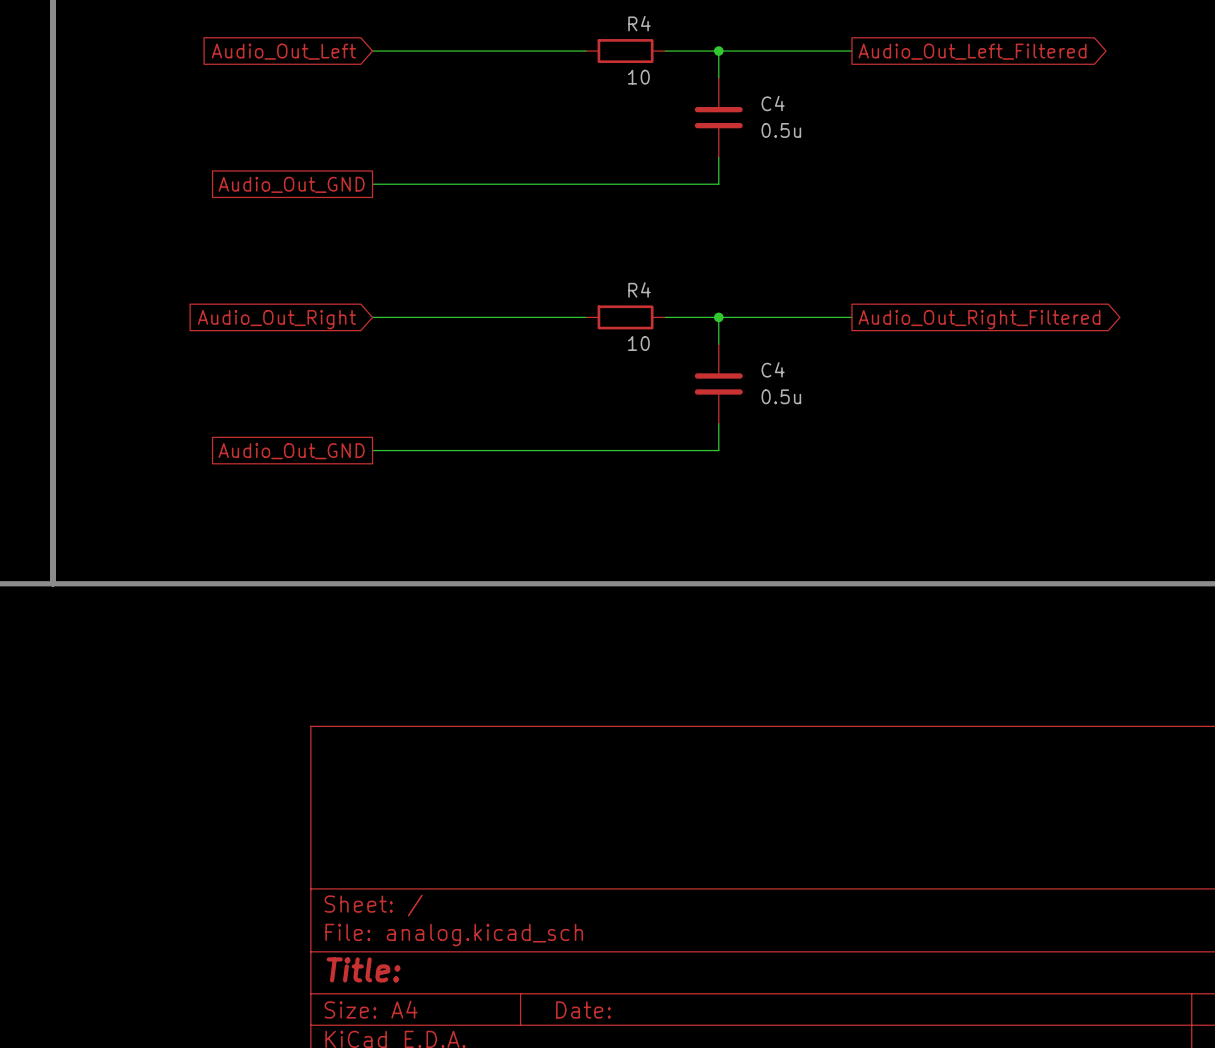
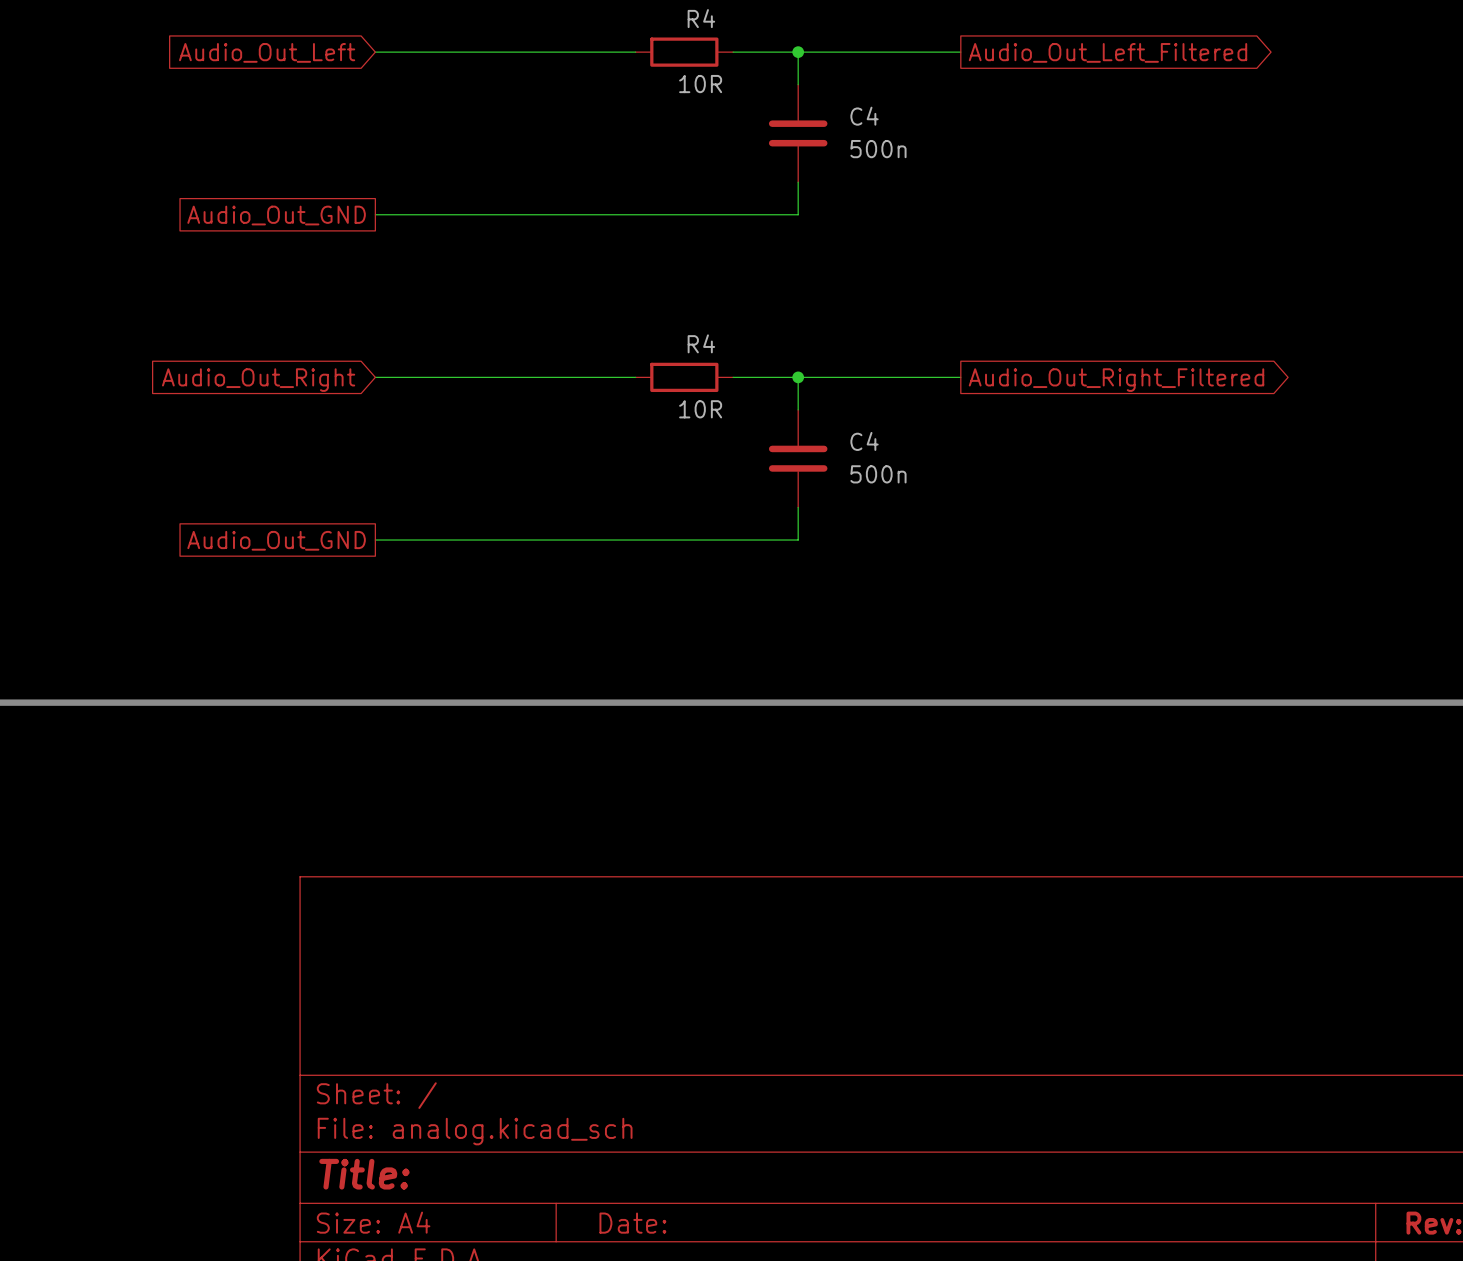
R4 value: 10 (638, 77) -> 10R (700, 84)
C4 value: 0.5u (781, 130) -> 500n (878, 149)
R4 value: 10 (638, 343) -> 10R (700, 409)
C4 value: 0.5u (781, 396) -> 500n (878, 474)

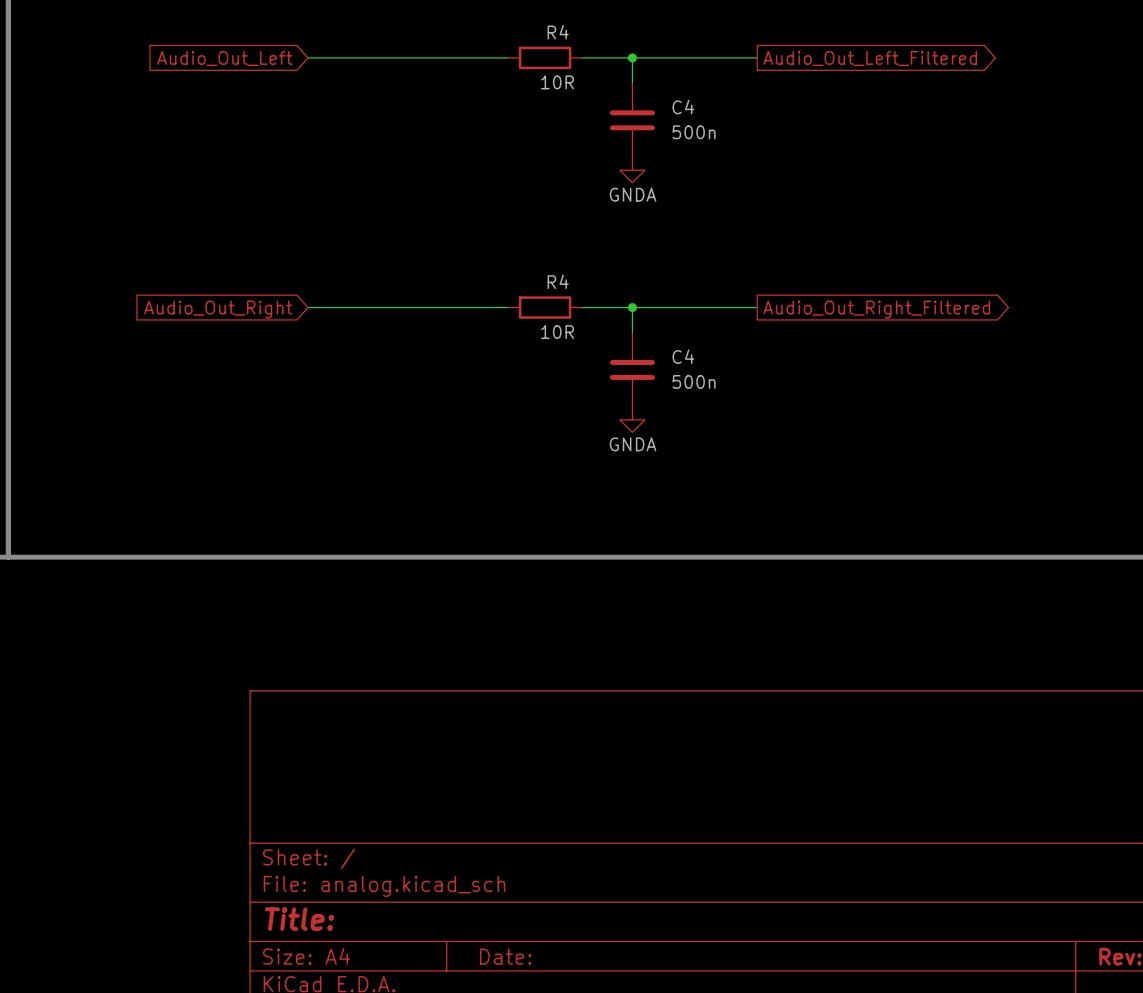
wire: (798, 182) (798, 214) (375, 214) -> none
power symbol: none -> GNDA (632, 170)
global label: Audio_Out_GND (276, 215) -> none
wire: (798, 507) (798, 540) (375, 540) -> none
power symbol: none -> GNDA (632, 419)
global label: Audio_Out_GND (276, 540) -> none

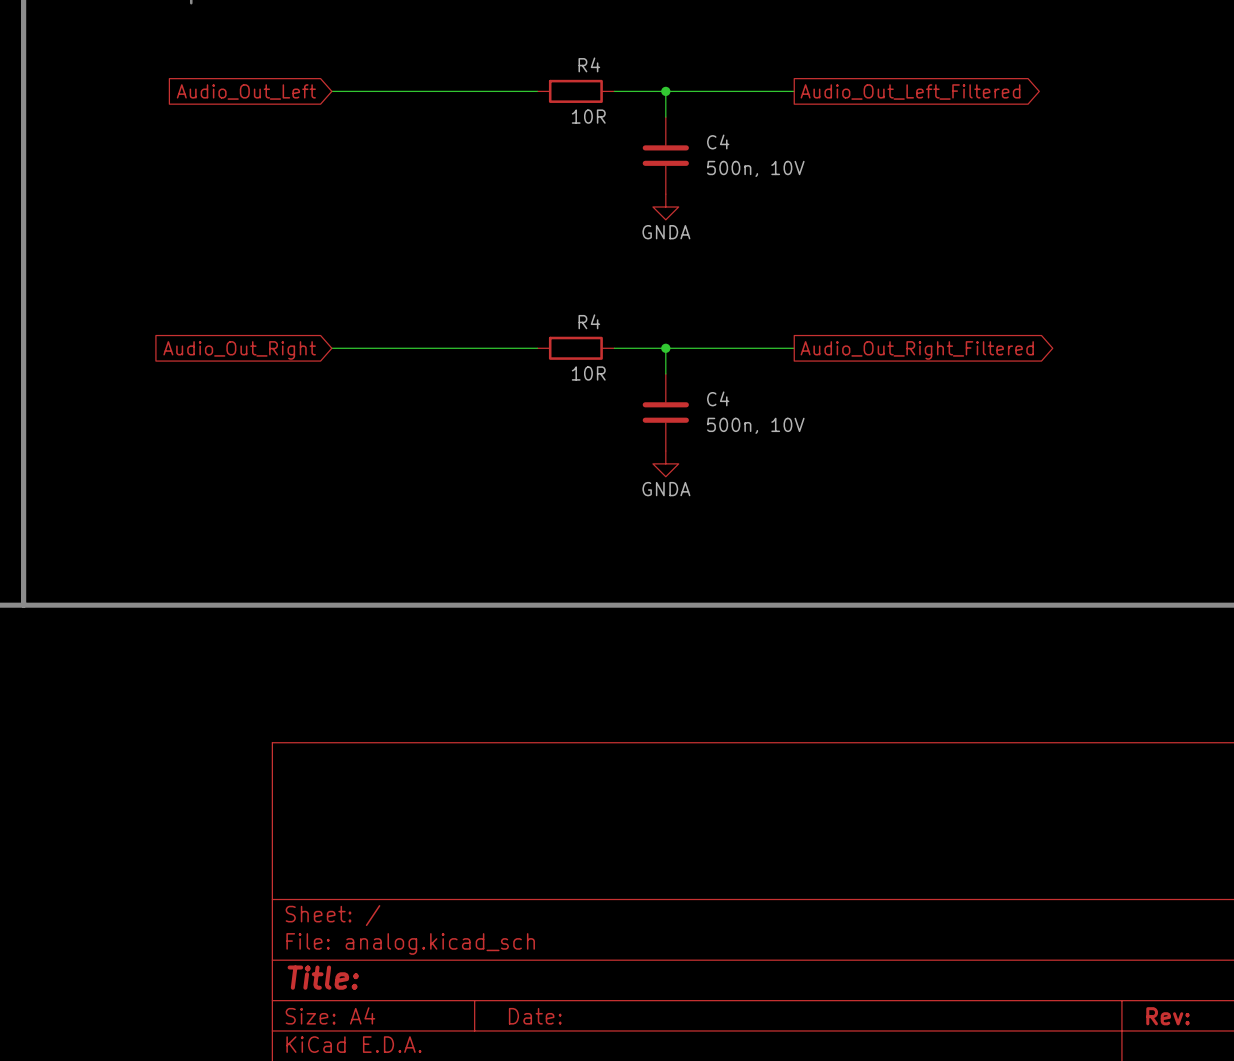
C4 value: 500n (694, 132) -> 500n, 10V (755, 168)
C4 value: 500n (694, 381) -> 500n, 10V (755, 425)

